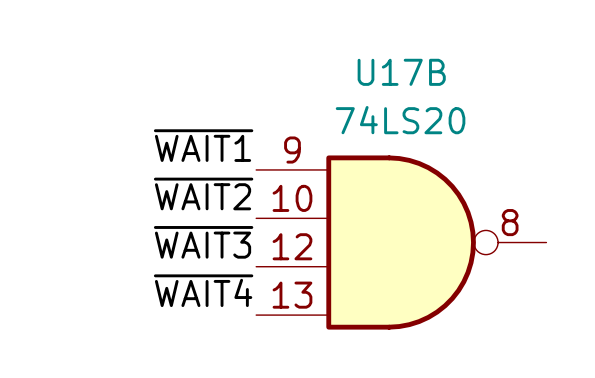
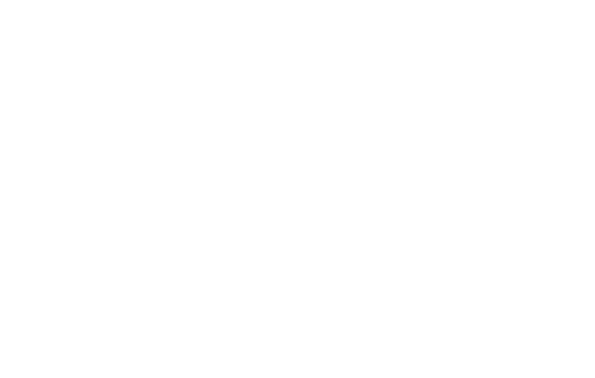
label: ~{WAIT1} (203, 145) -> none
label: ~{WAIT2} (203, 193) -> none
label: ~{WAIT3} (203, 242) -> none
U17B: 74LS20 (401, 242) -> none
label: ~{WAIT4} (203, 290) -> none

